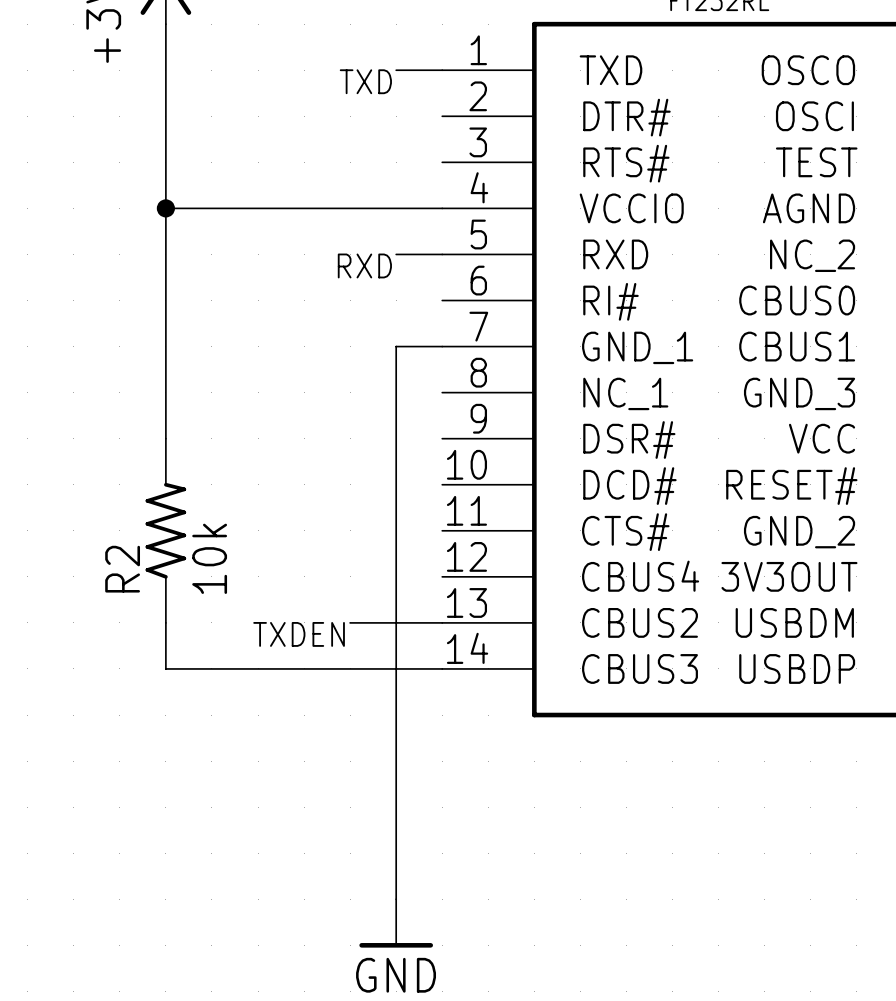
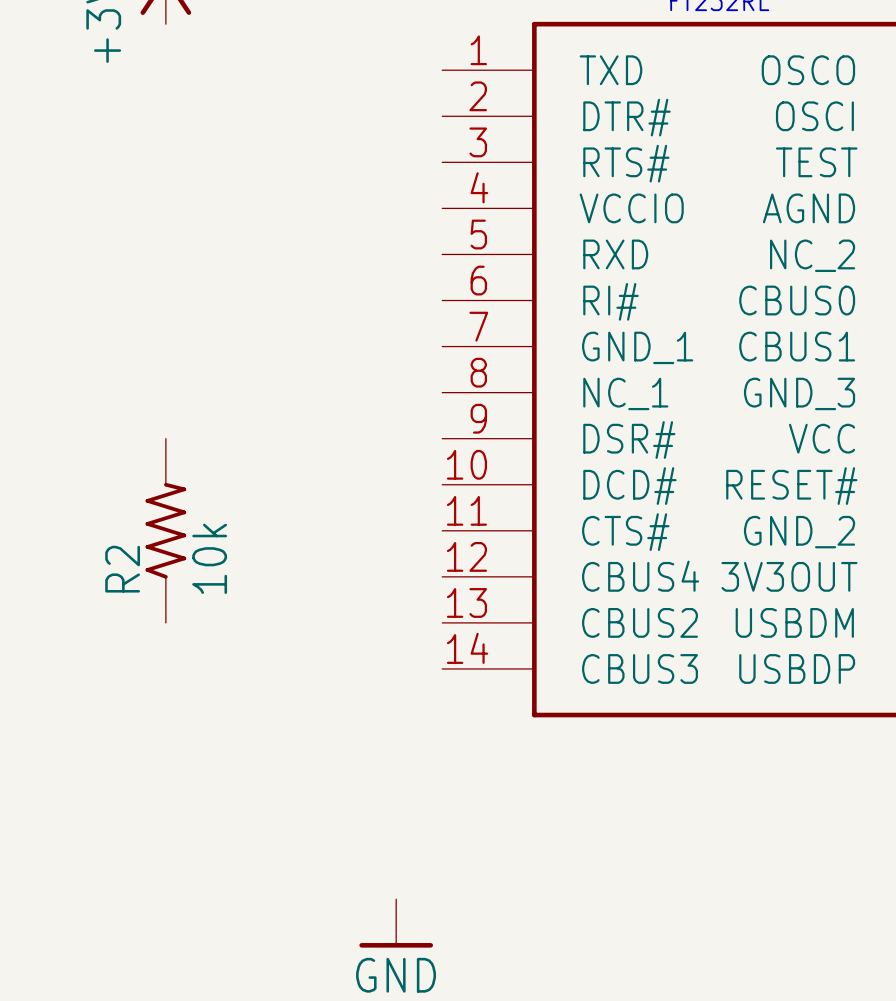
wire: (165, 24) (165, 438) -> none
wire: (396, 70) (442, 70) -> none
label: TXD (365, 81) -> none
wire: (165, 208) (442, 208) -> none
junction: (165, 208) -> none
wire: (396, 254) (442, 254) -> none
label: RXD (364, 265) -> none
wire: (442, 346) (396, 346) (396, 899) -> none
wire: (165, 622) (165, 668) (442, 668) -> none
wire: (350, 622) (442, 622) -> none
label: TXDEN (299, 634) -> none

